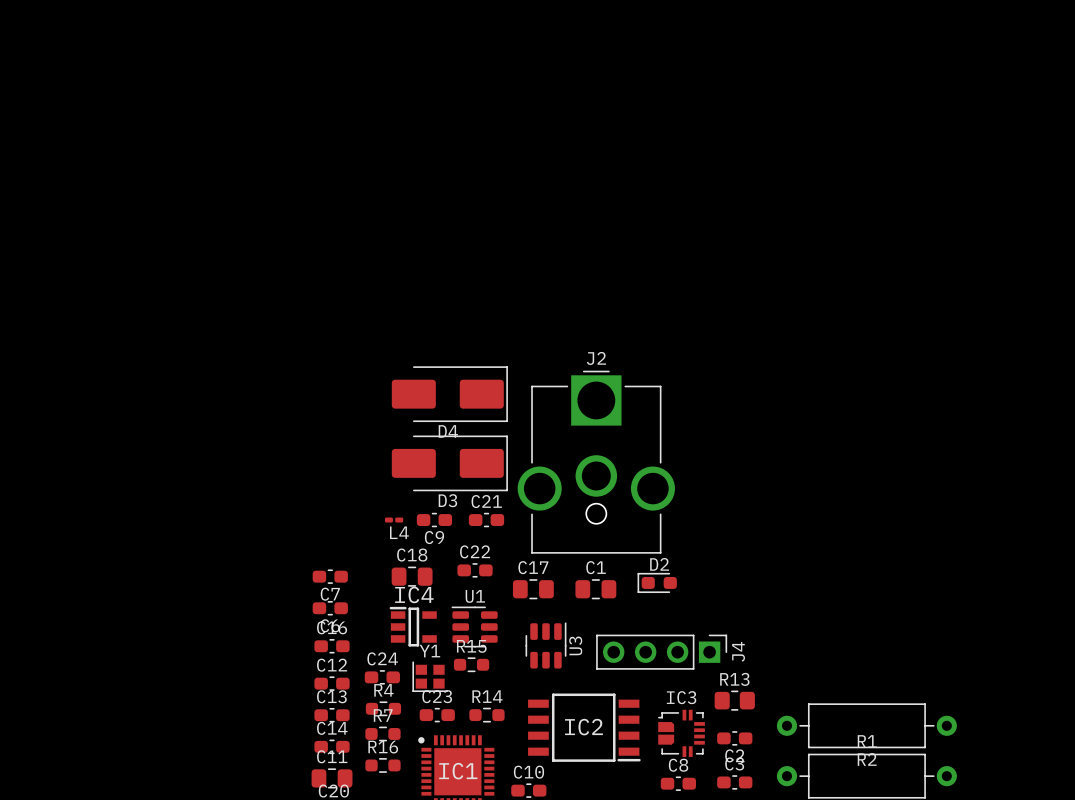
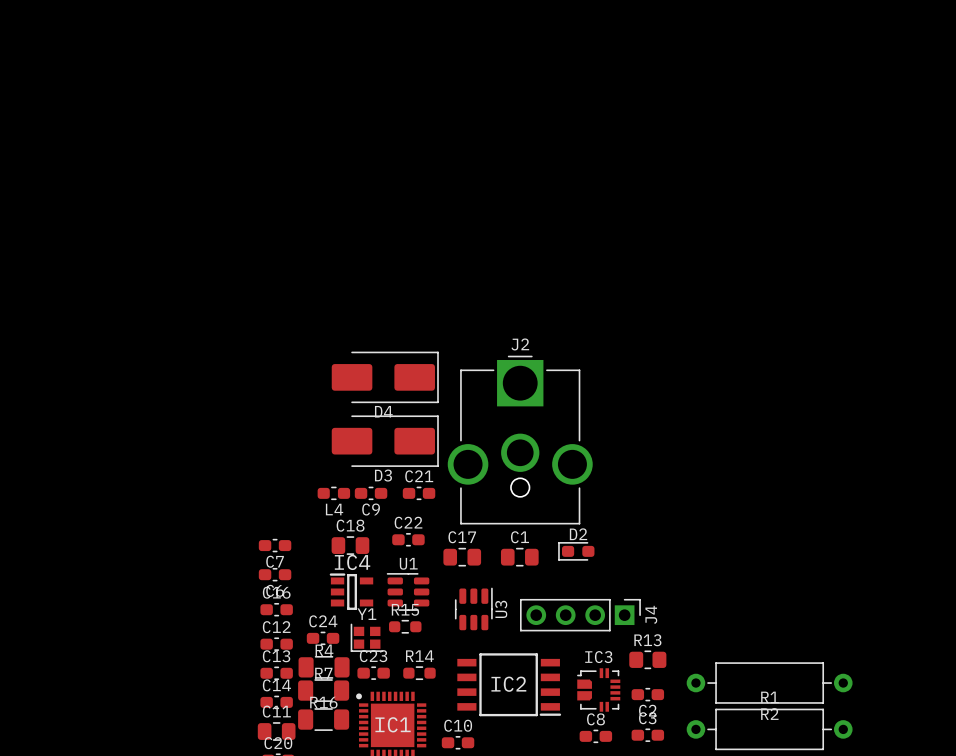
L4 footprint: [384, 517, 404, 523] -> [317, 486, 351, 500]
R4 footprint: [365, 701, 402, 717] -> [298, 656, 350, 679]
R7 footprint: [365, 726, 401, 742] -> [298, 679, 350, 702]
R16 footprint: [365, 758, 401, 773] -> [298, 708, 350, 731]

